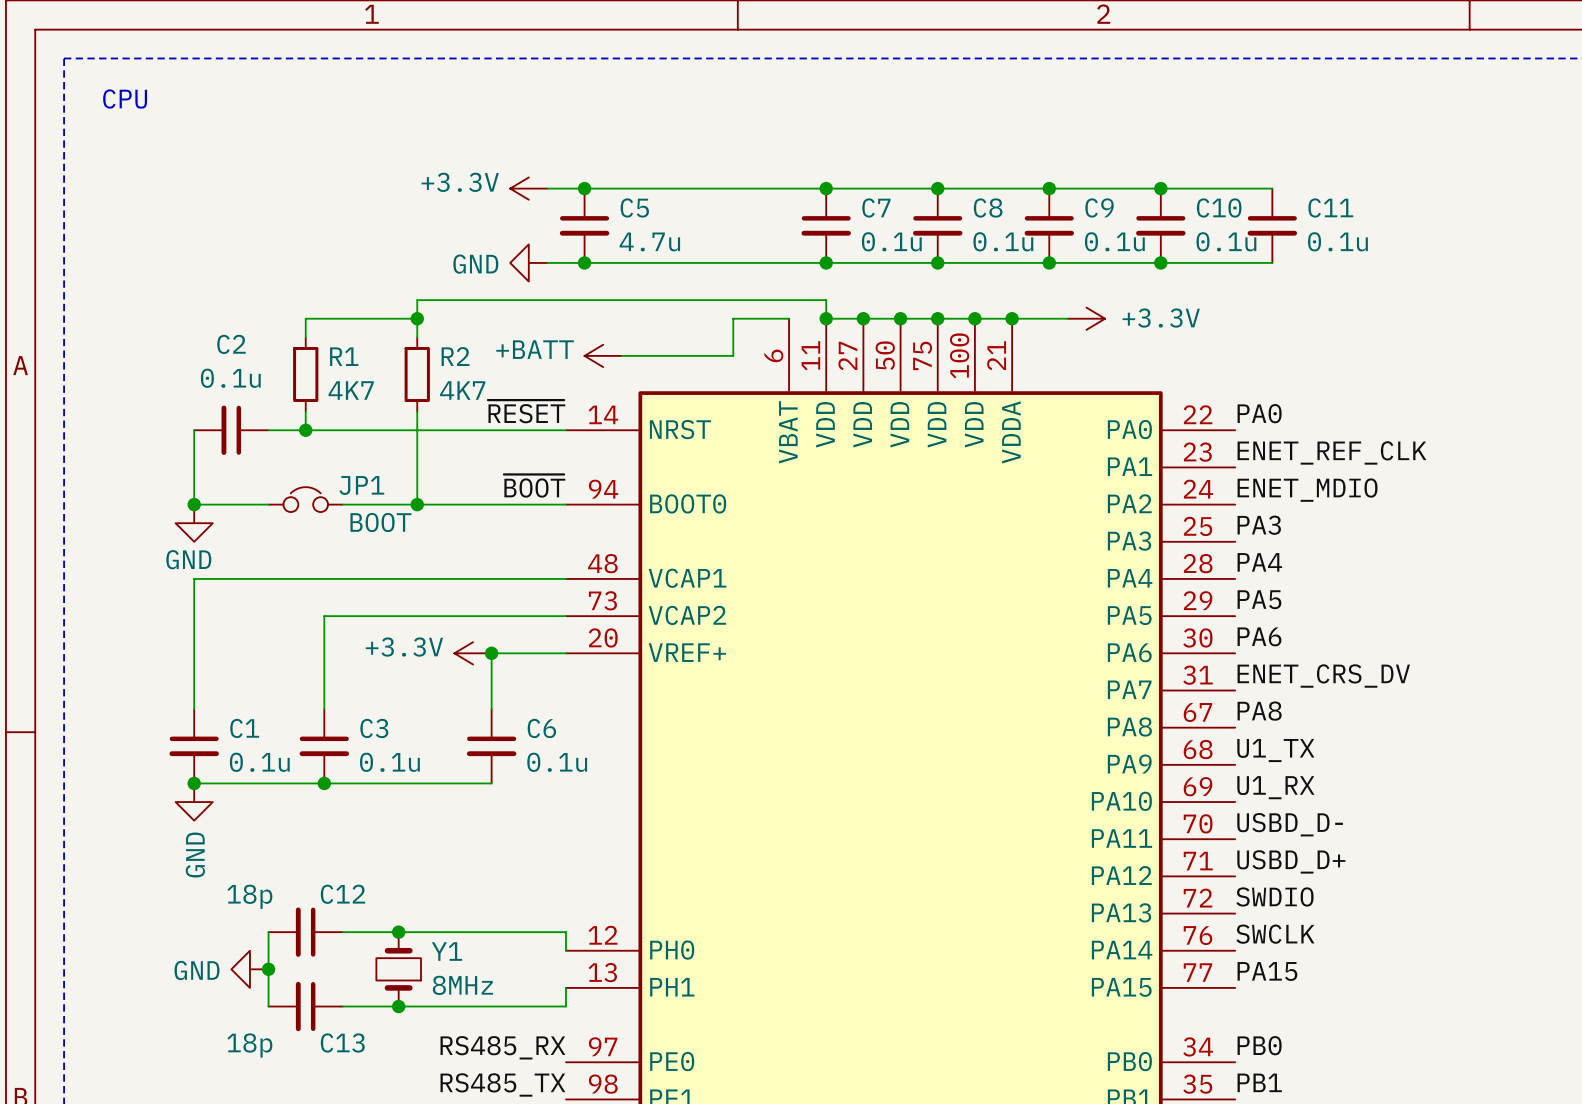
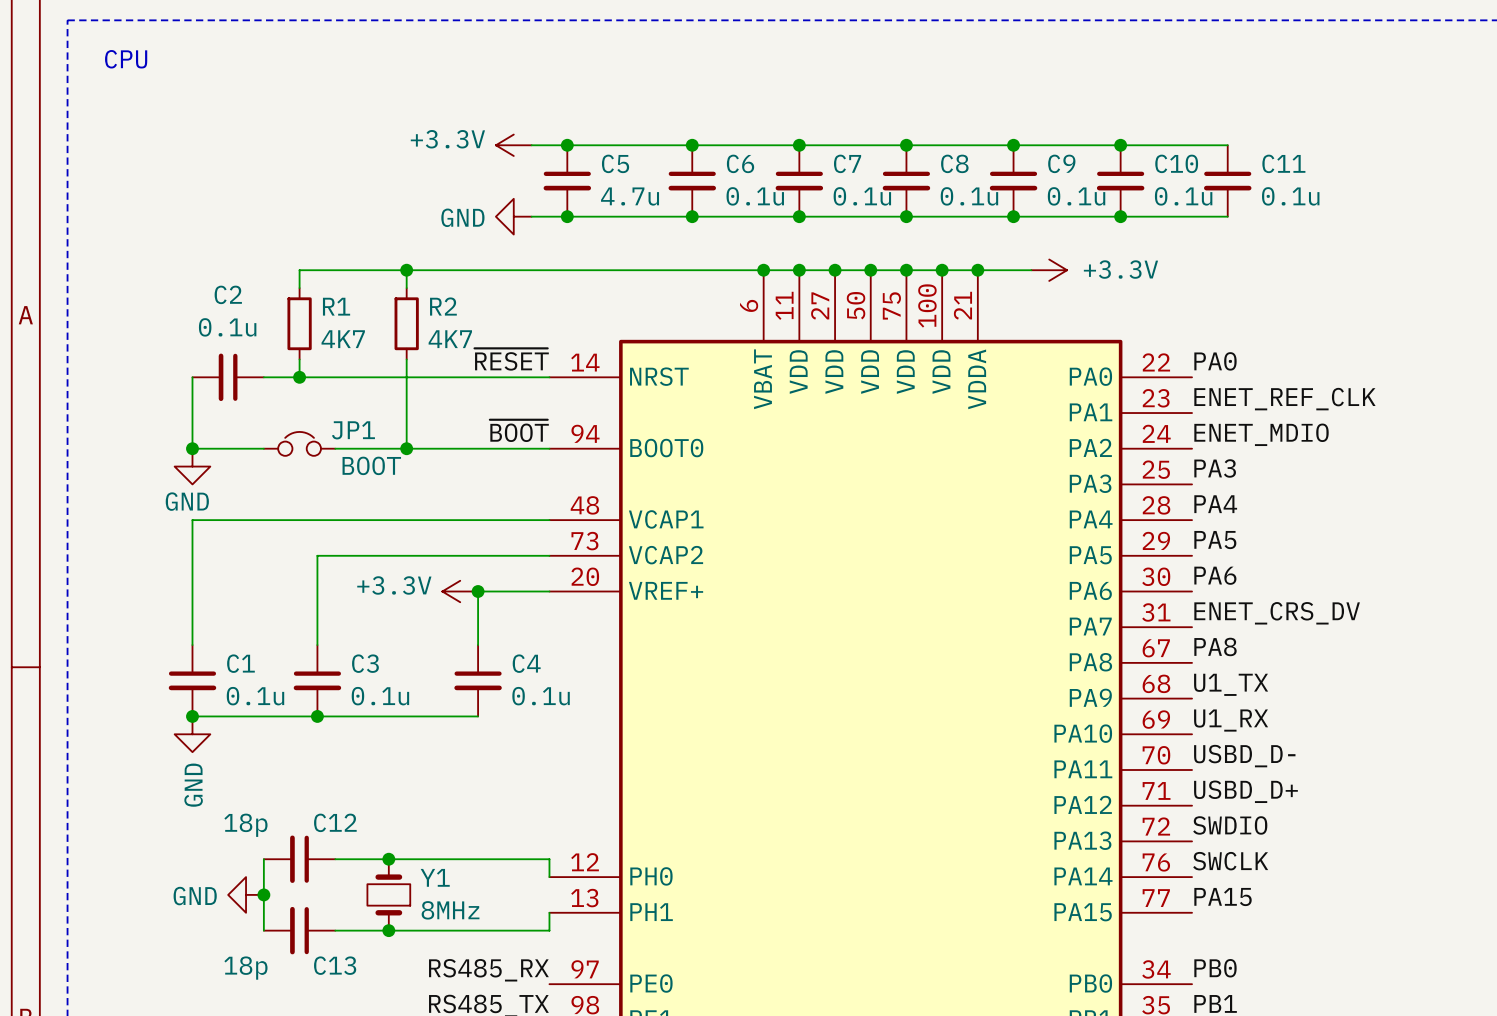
junction: none -> (692, 145)
C6: none -> 0.1u (692, 180)
junction: none -> (692, 216)
wire: (417, 318) (417, 300) (826, 300) (826, 318) -> (406, 270) (710, 270)
wire: (733, 318) (733, 355) (621, 355) -> none
wire: none -> (763, 270) (799, 270)
junction: none -> (763, 270)
power symbol: +BATT (603, 355) -> none
C6 name: C6 (541, 728) -> C4 (526, 663)

